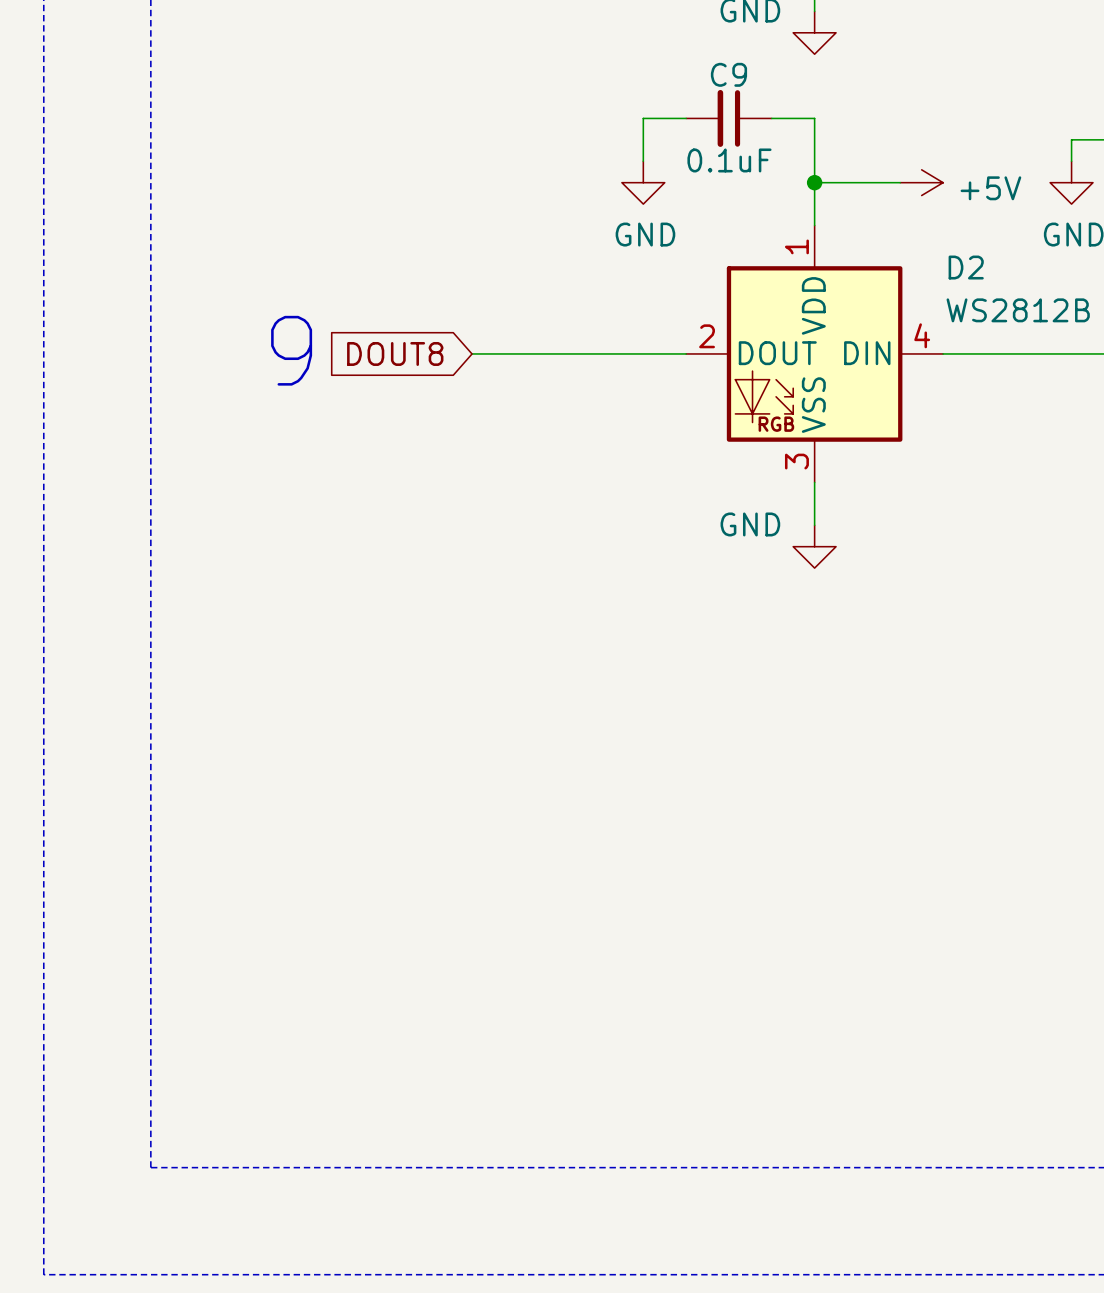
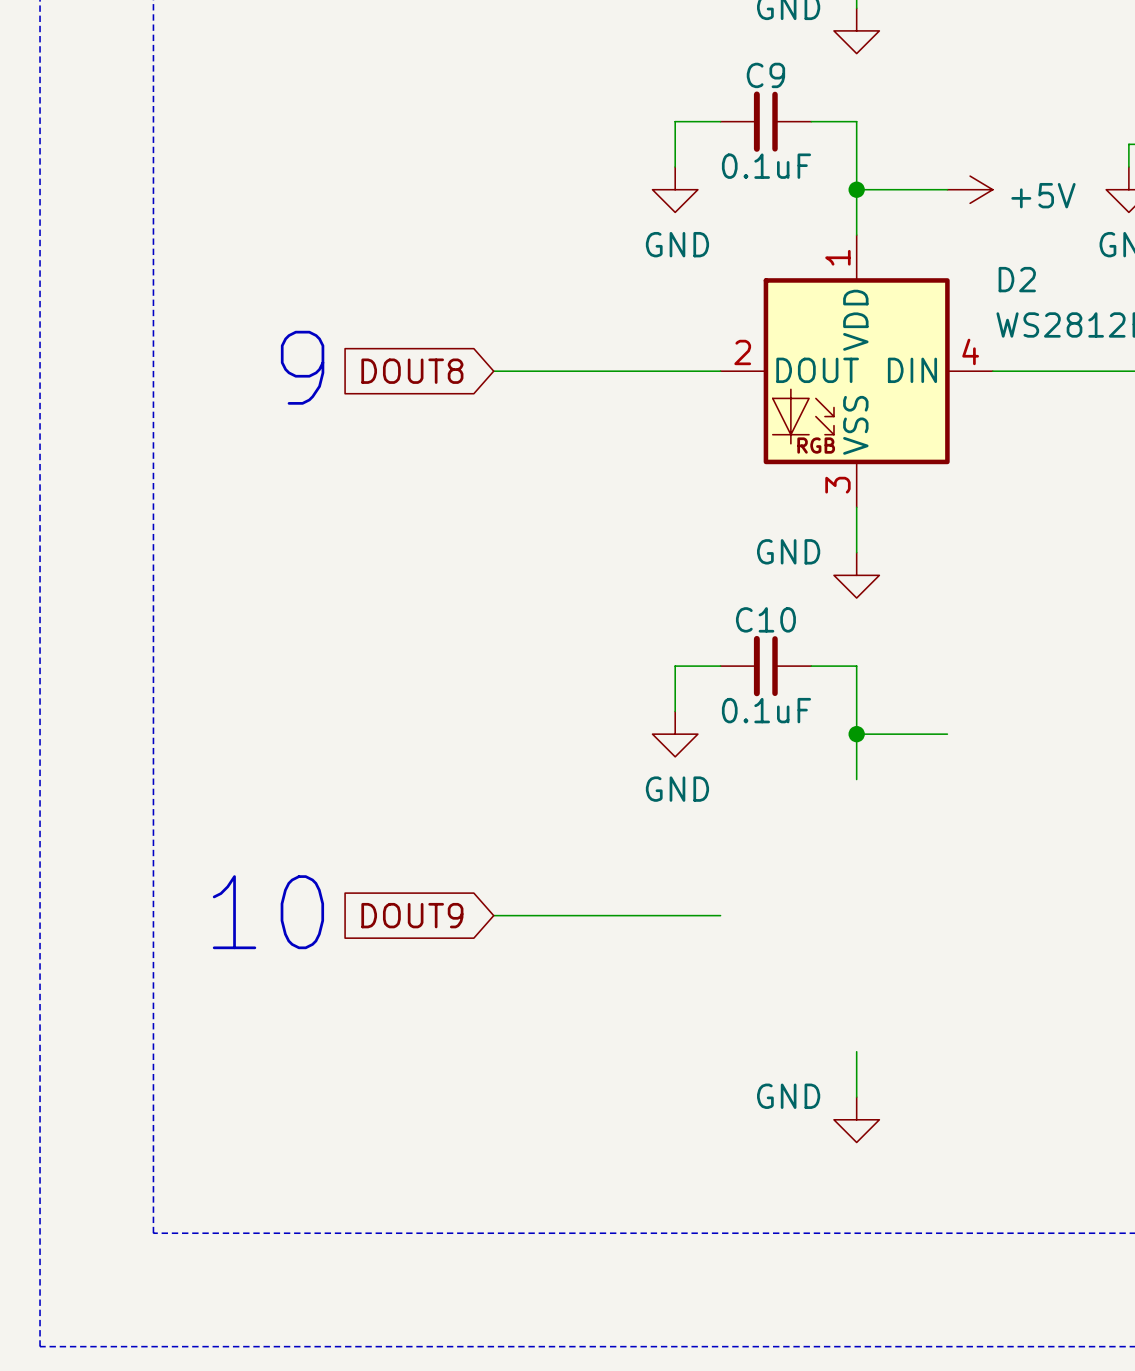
wire: none -> (720, 666) (675, 666) (675, 711)
C10: none -> 0.1uF (765, 666)
wire: none -> (811, 666) (856, 666) (856, 779)
power symbol: none -> GND (675, 734)
wire: none -> (856, 734) (947, 734)
junction: none -> (856, 734)
text: none -> 10 (268, 912)
global label: none -> DOUT9 (412, 915)
wire: none -> (493, 915) (720, 915)
wire: none -> (856, 1051) (856, 1097)
power symbol: none -> GND (856, 1119)

